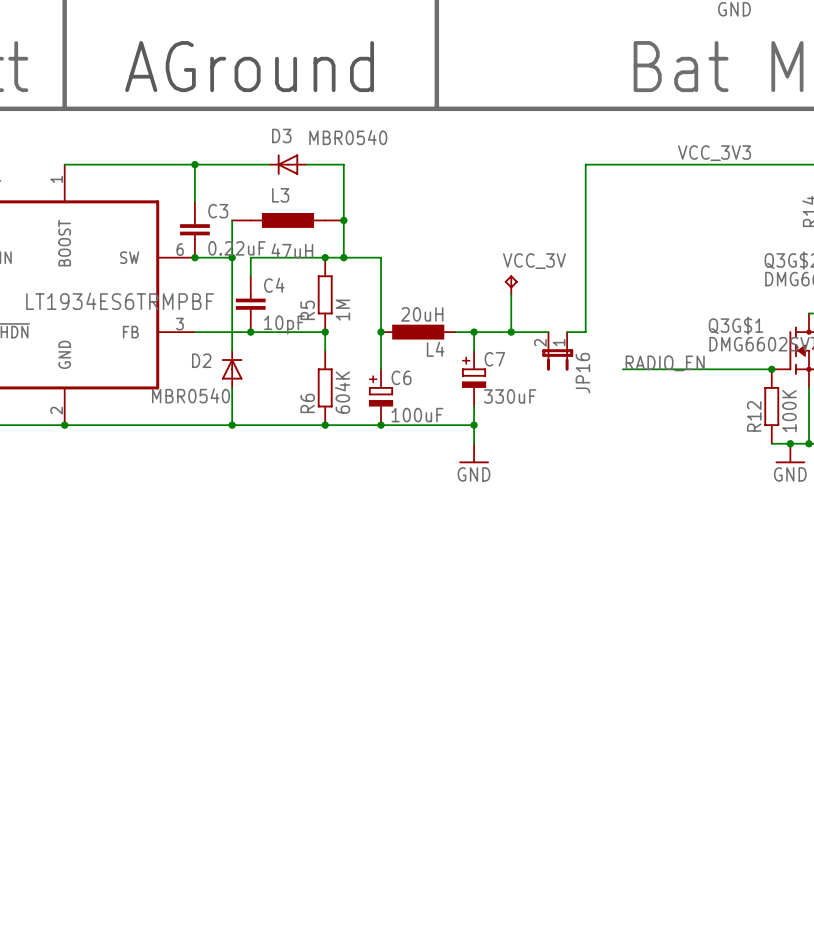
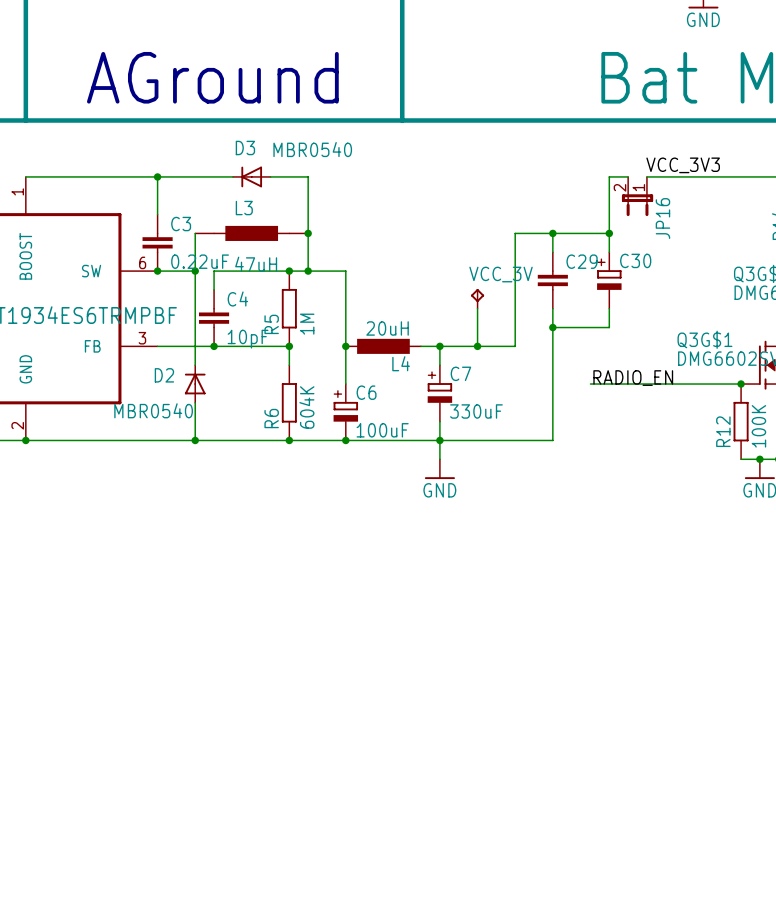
wire: (641, 164) (585, 164) (585, 220) -> (609, 176) (609, 252)
wire: (660, 164) (678, 164) -> none
junction: none -> (552, 233)
wire: none -> (609, 233) (515, 233) (515, 346)
junction: none -> (609, 233)
C29: none -> (552, 280)
C30: none -> (609, 280)
wire: none -> (609, 308) (609, 327) (552, 327)
junction: none -> (552, 327)
wire: (567, 332) (585, 332) -> (439, 440) (552, 440) (552, 346)
JP16 position: (557, 351) -> (637, 196)

